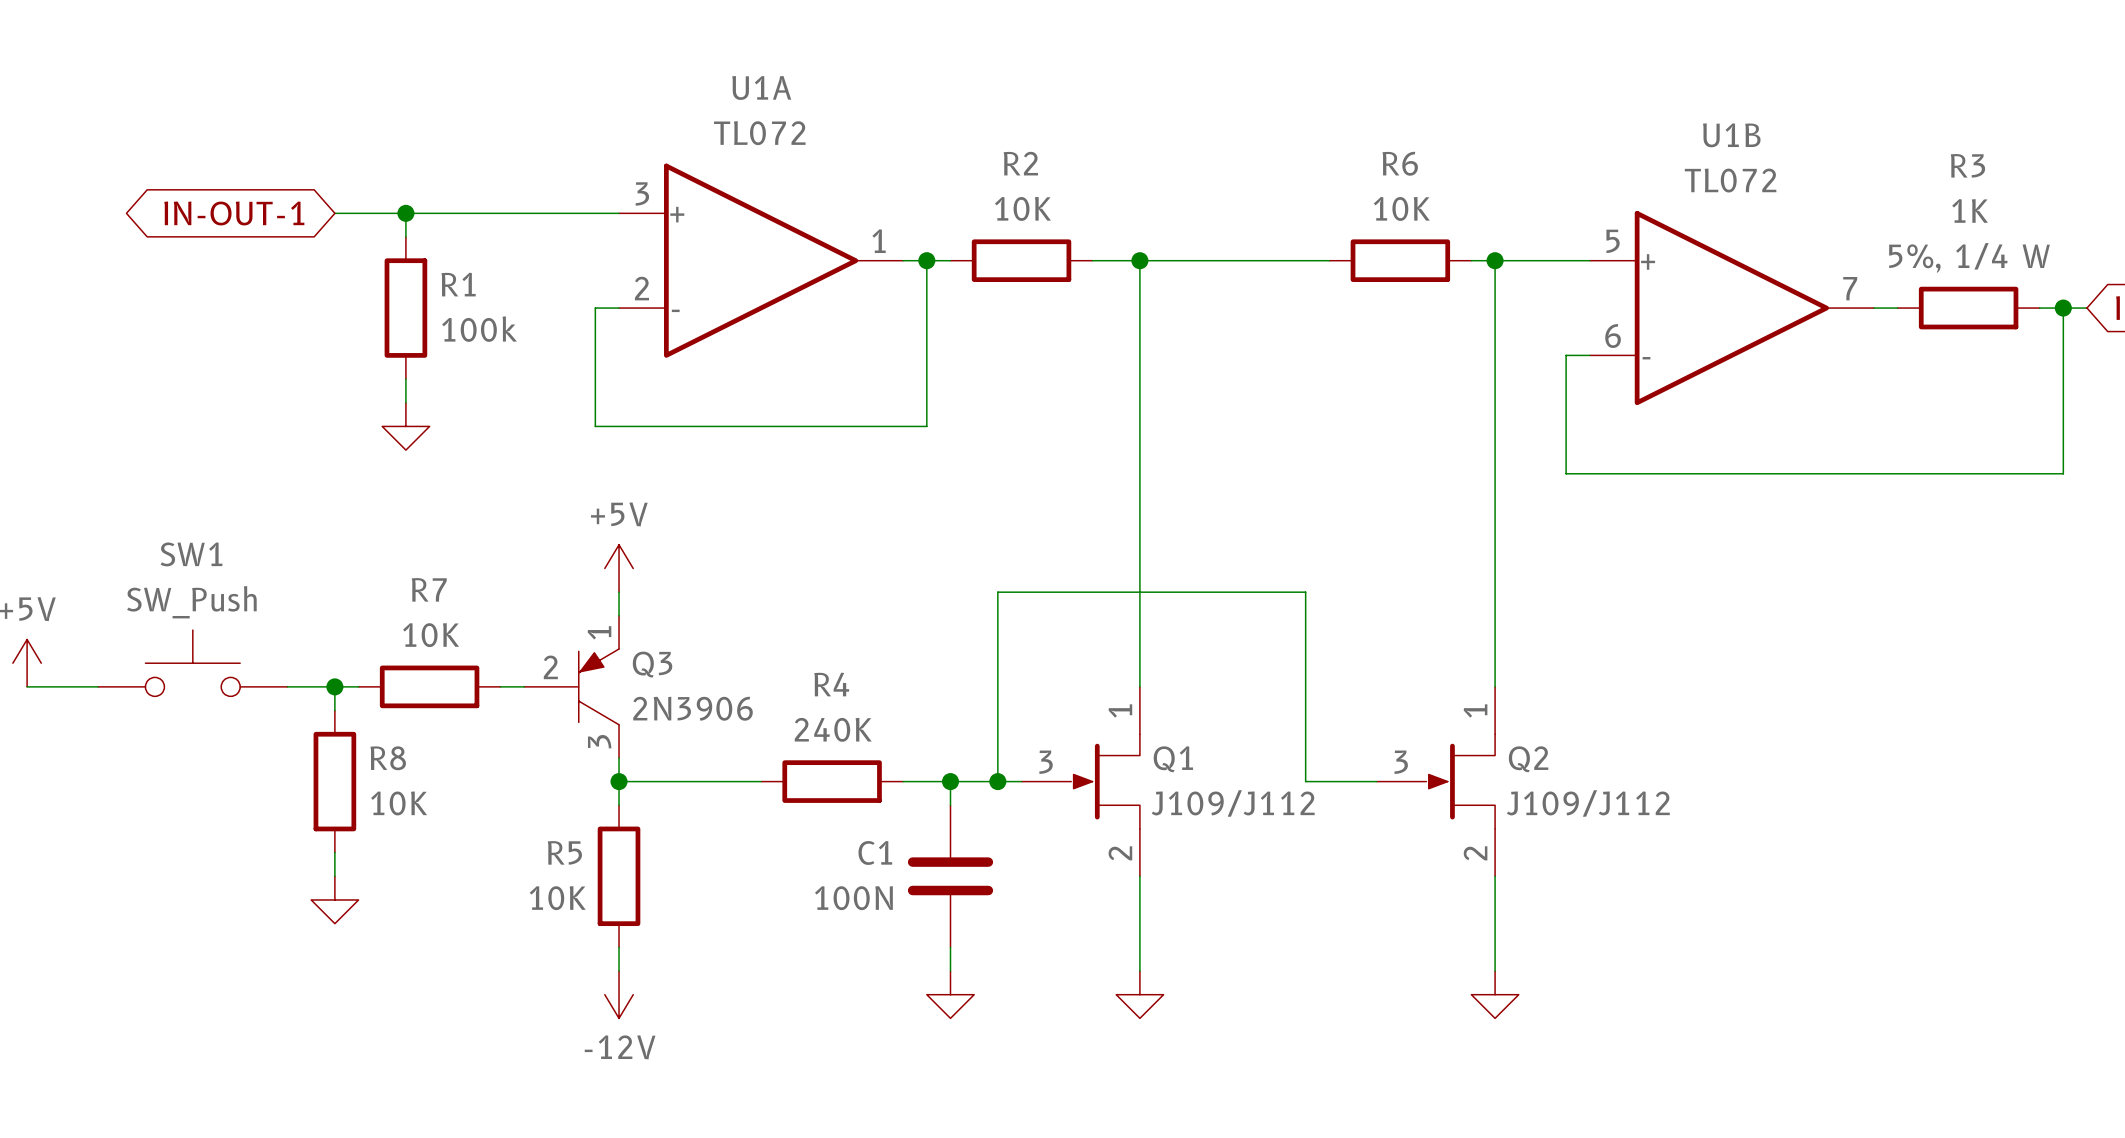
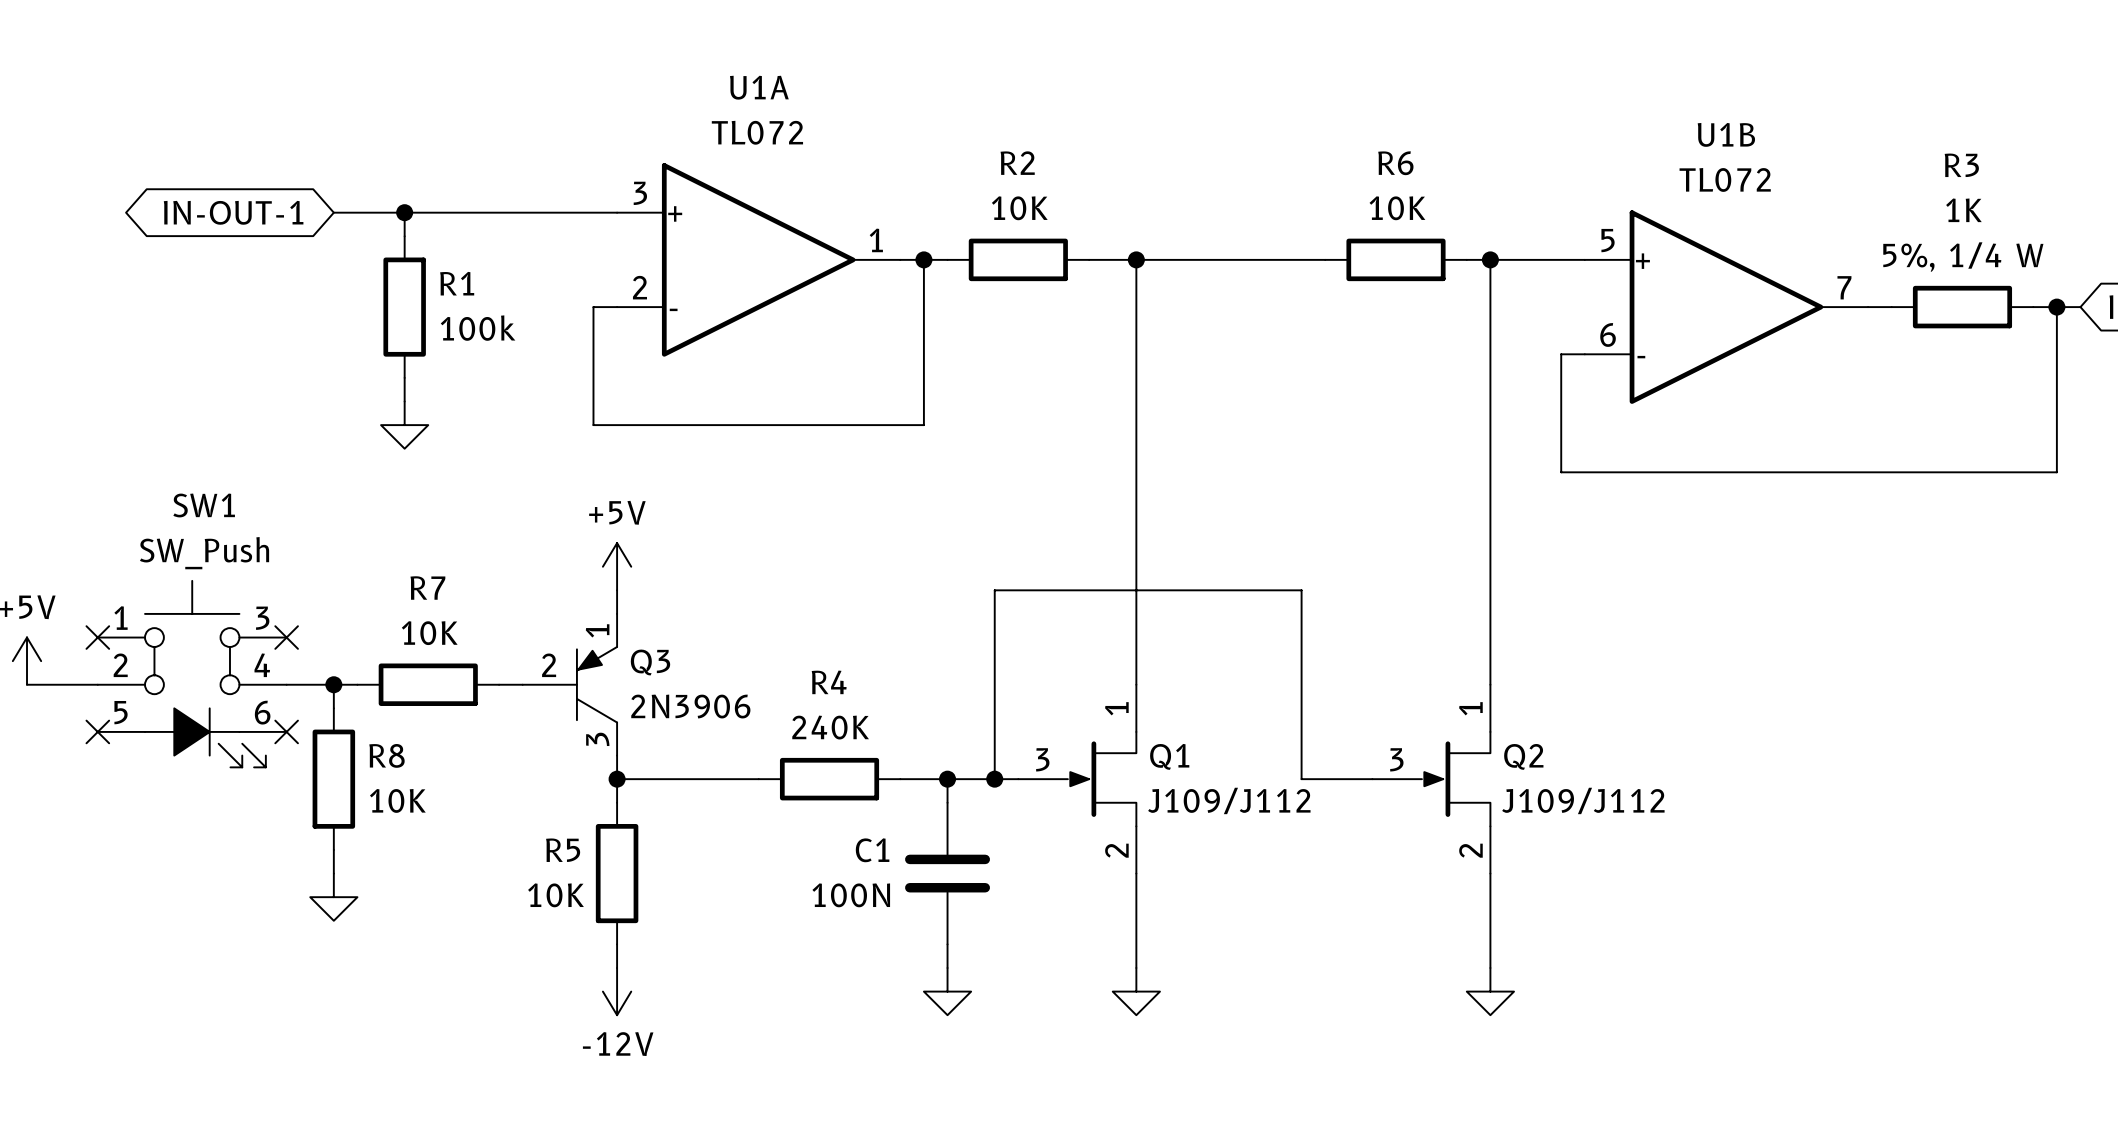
SW1 name position: SW1 (191, 554) -> SW1 (204, 505)
SW1 value position: SW_Push (191, 602) -> SW_Push (204, 553)
SW1 symbol: [98, 630, 288, 697] -> [97, 580, 287, 768]
no-connect mark: none -> (97, 637)
no-connect mark: none -> (286, 637)
no-connect mark: none -> (97, 731)
no-connect mark: none -> (286, 731)

